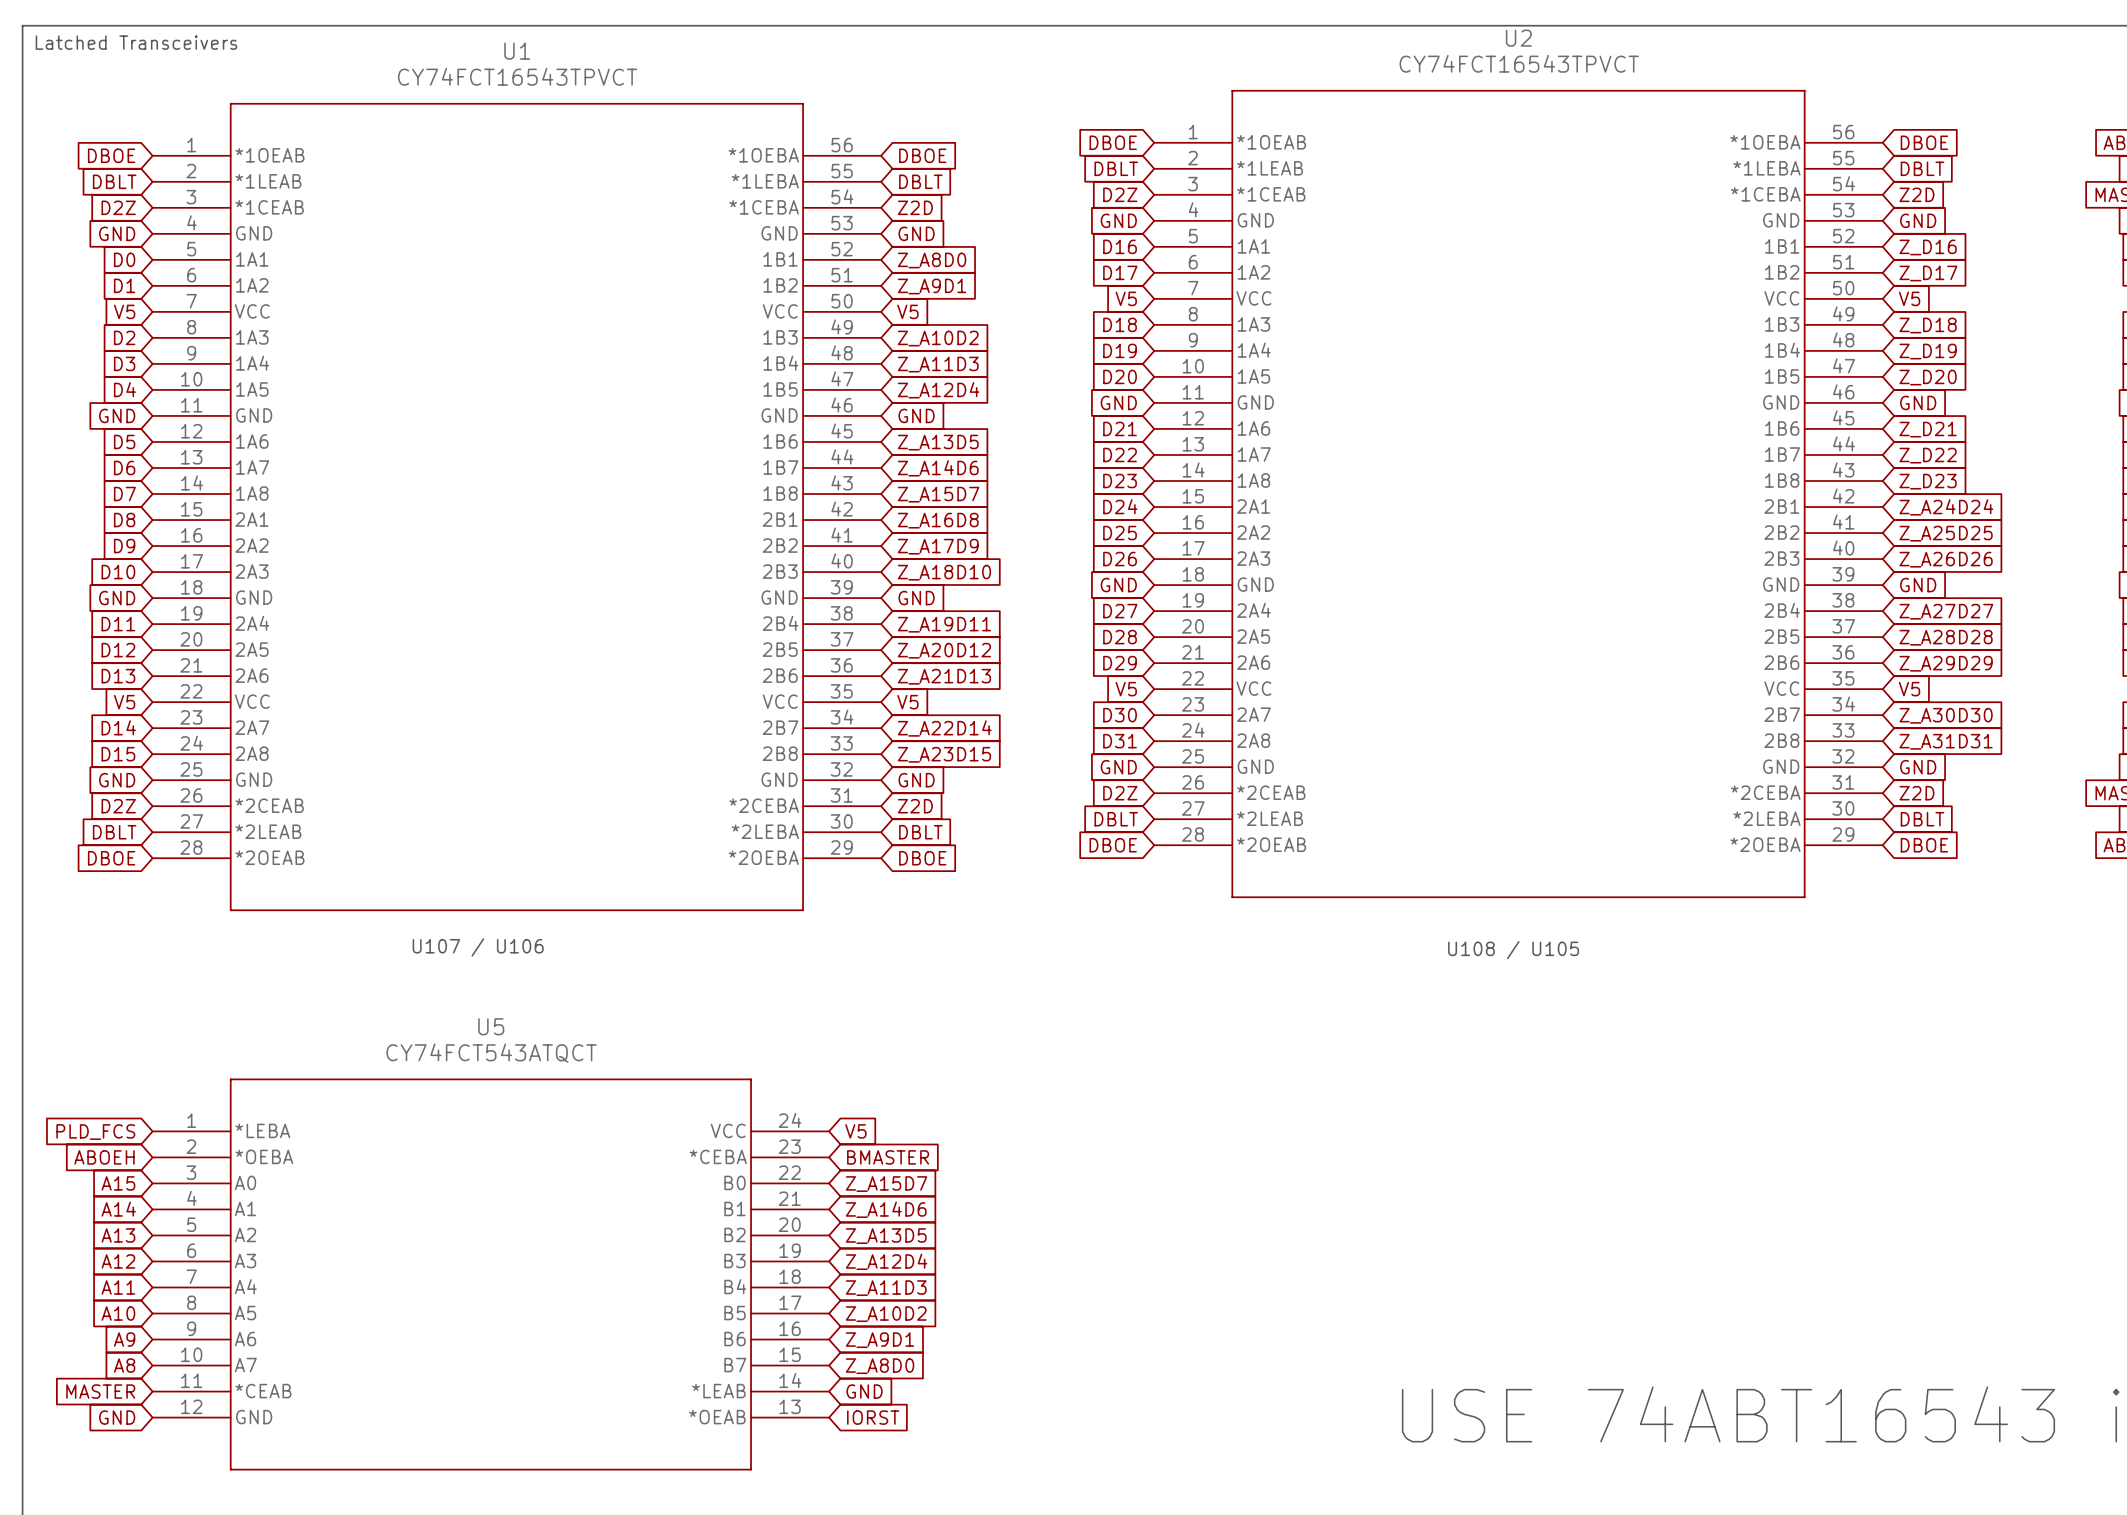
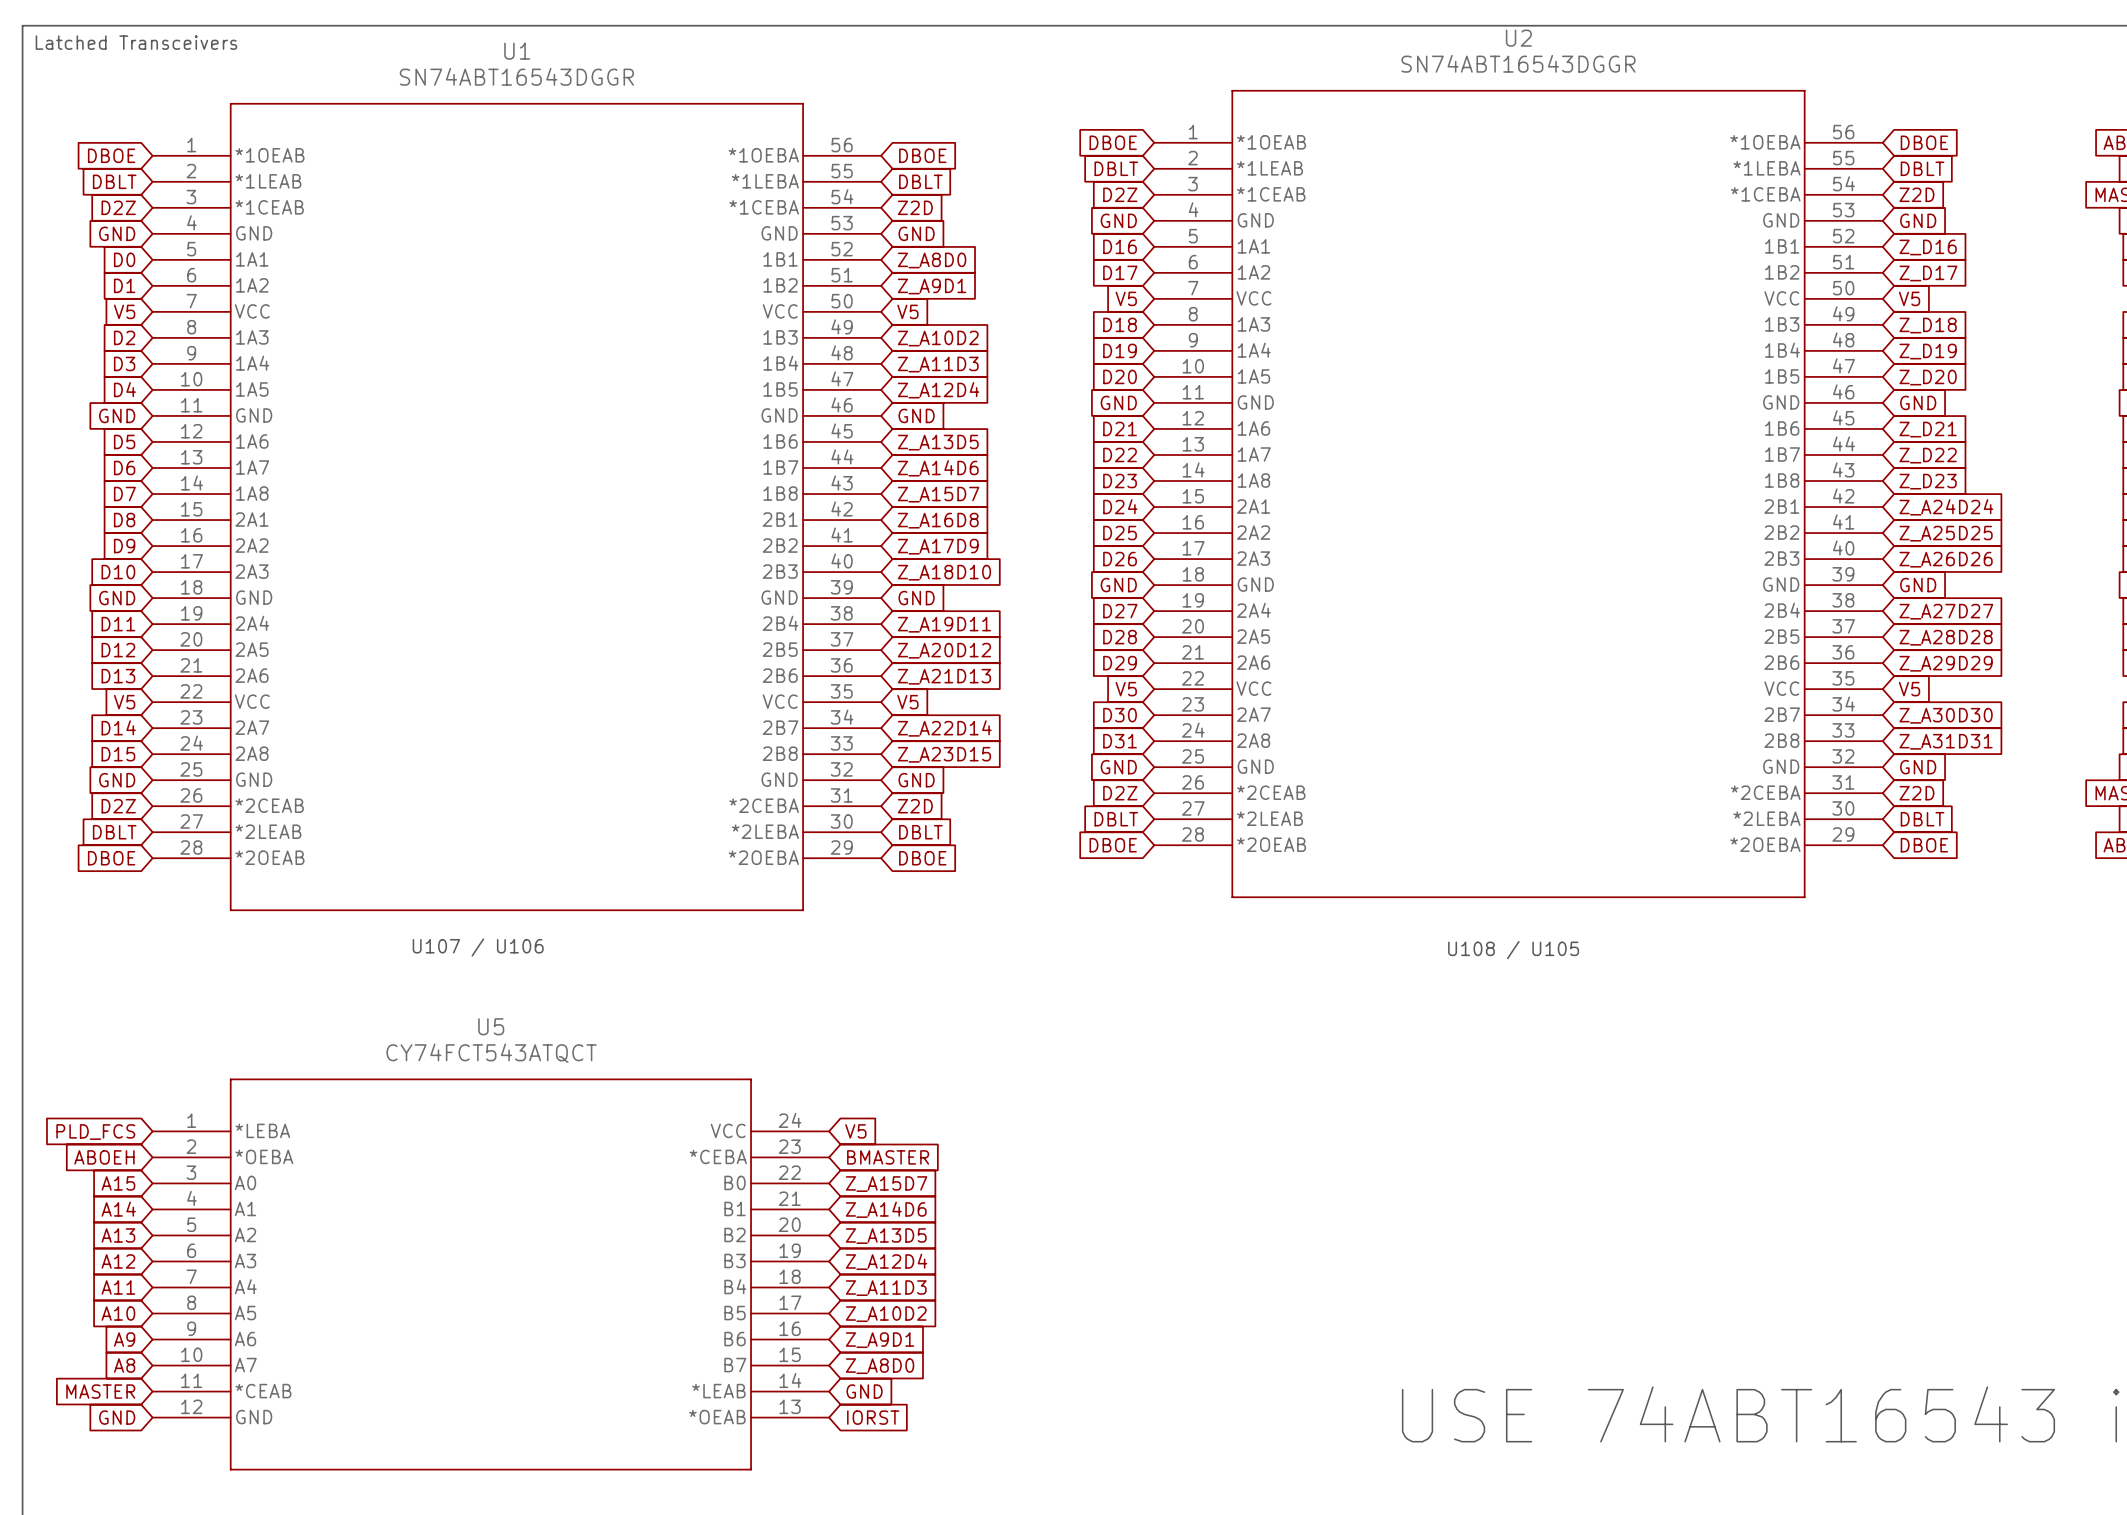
U2 value: CY74FCT16543TPVCT (1519, 63) -> SN74ABT16543DGGR (1518, 63)
U1 value: CY74FCT16543TPVCT (517, 76) -> SN74ABT16543DGGR (516, 76)

